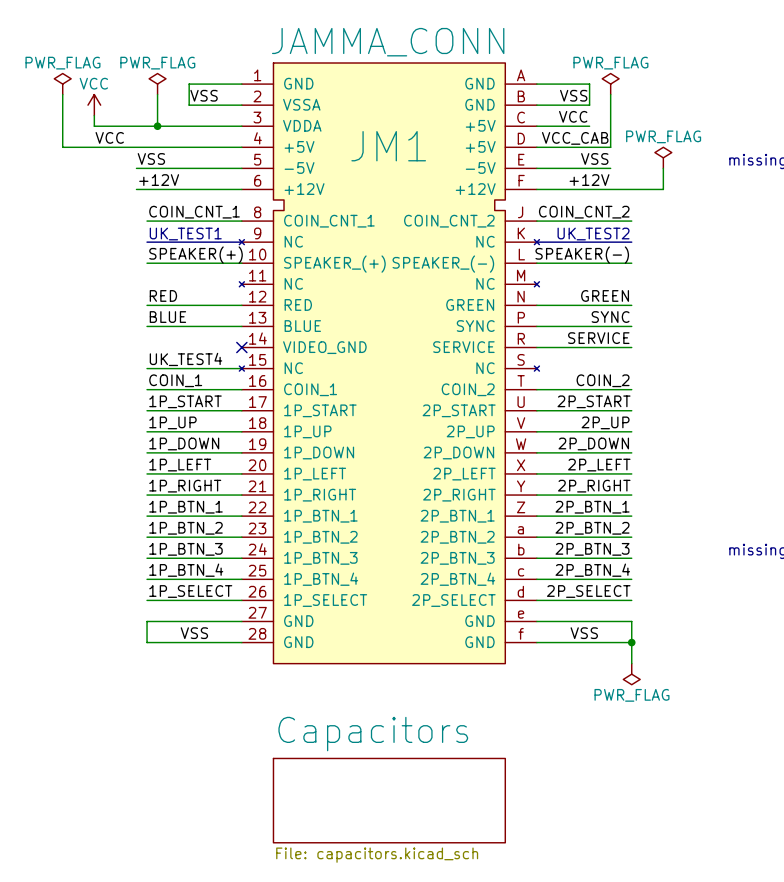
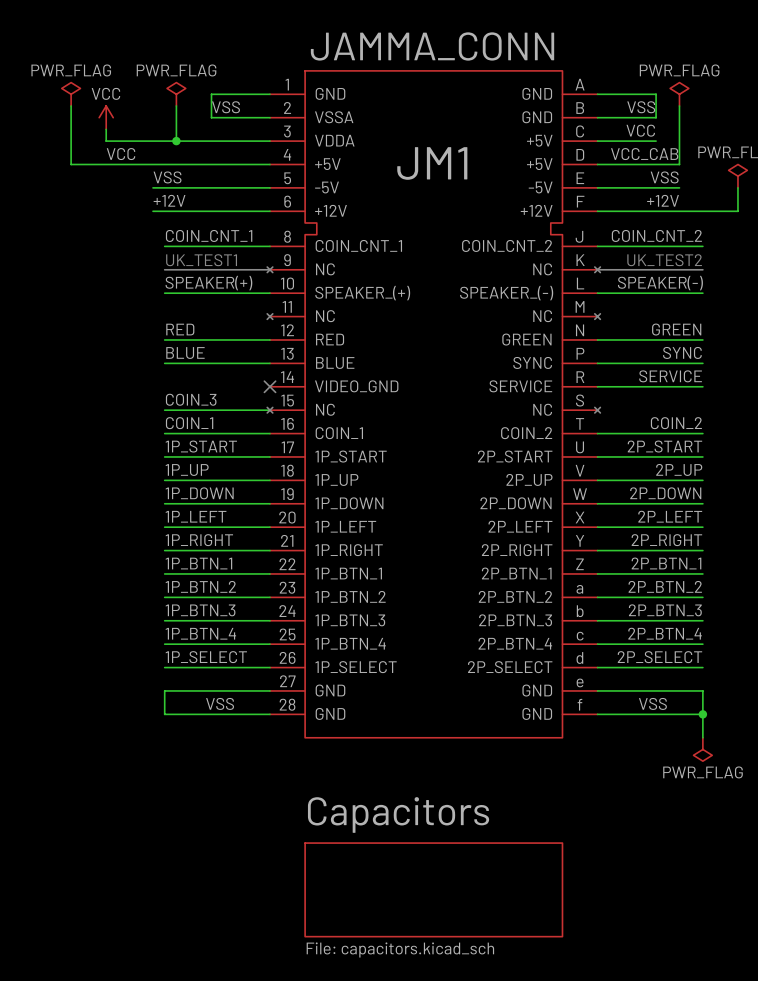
label: UK_TEST4 (185, 359) -> COIN_3 (191, 399)

